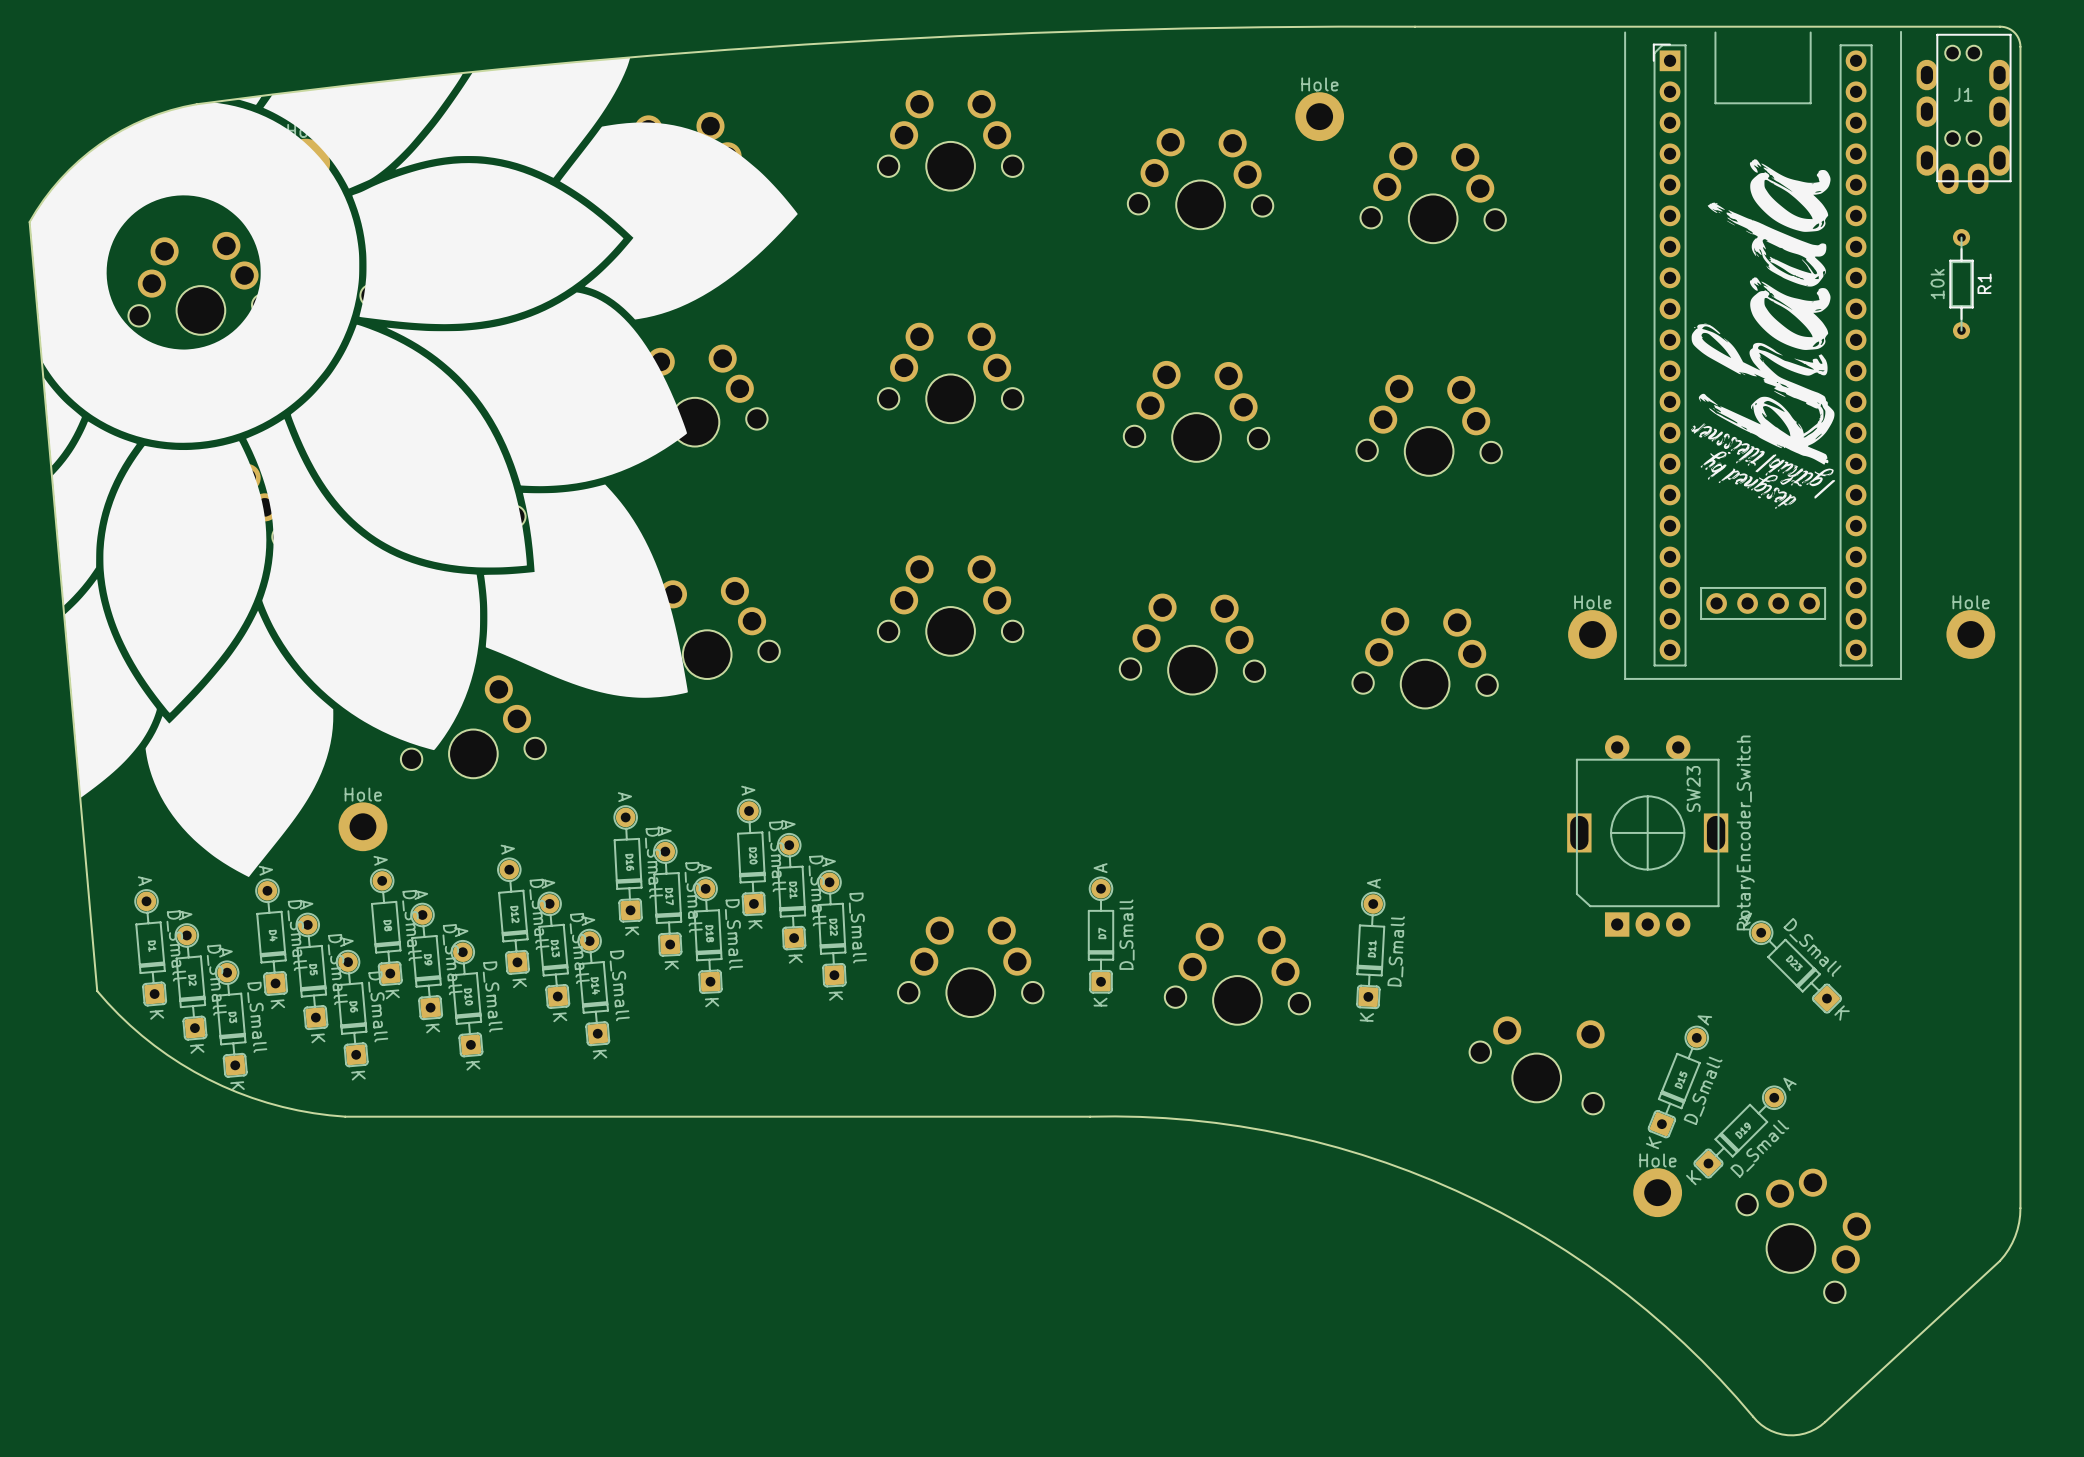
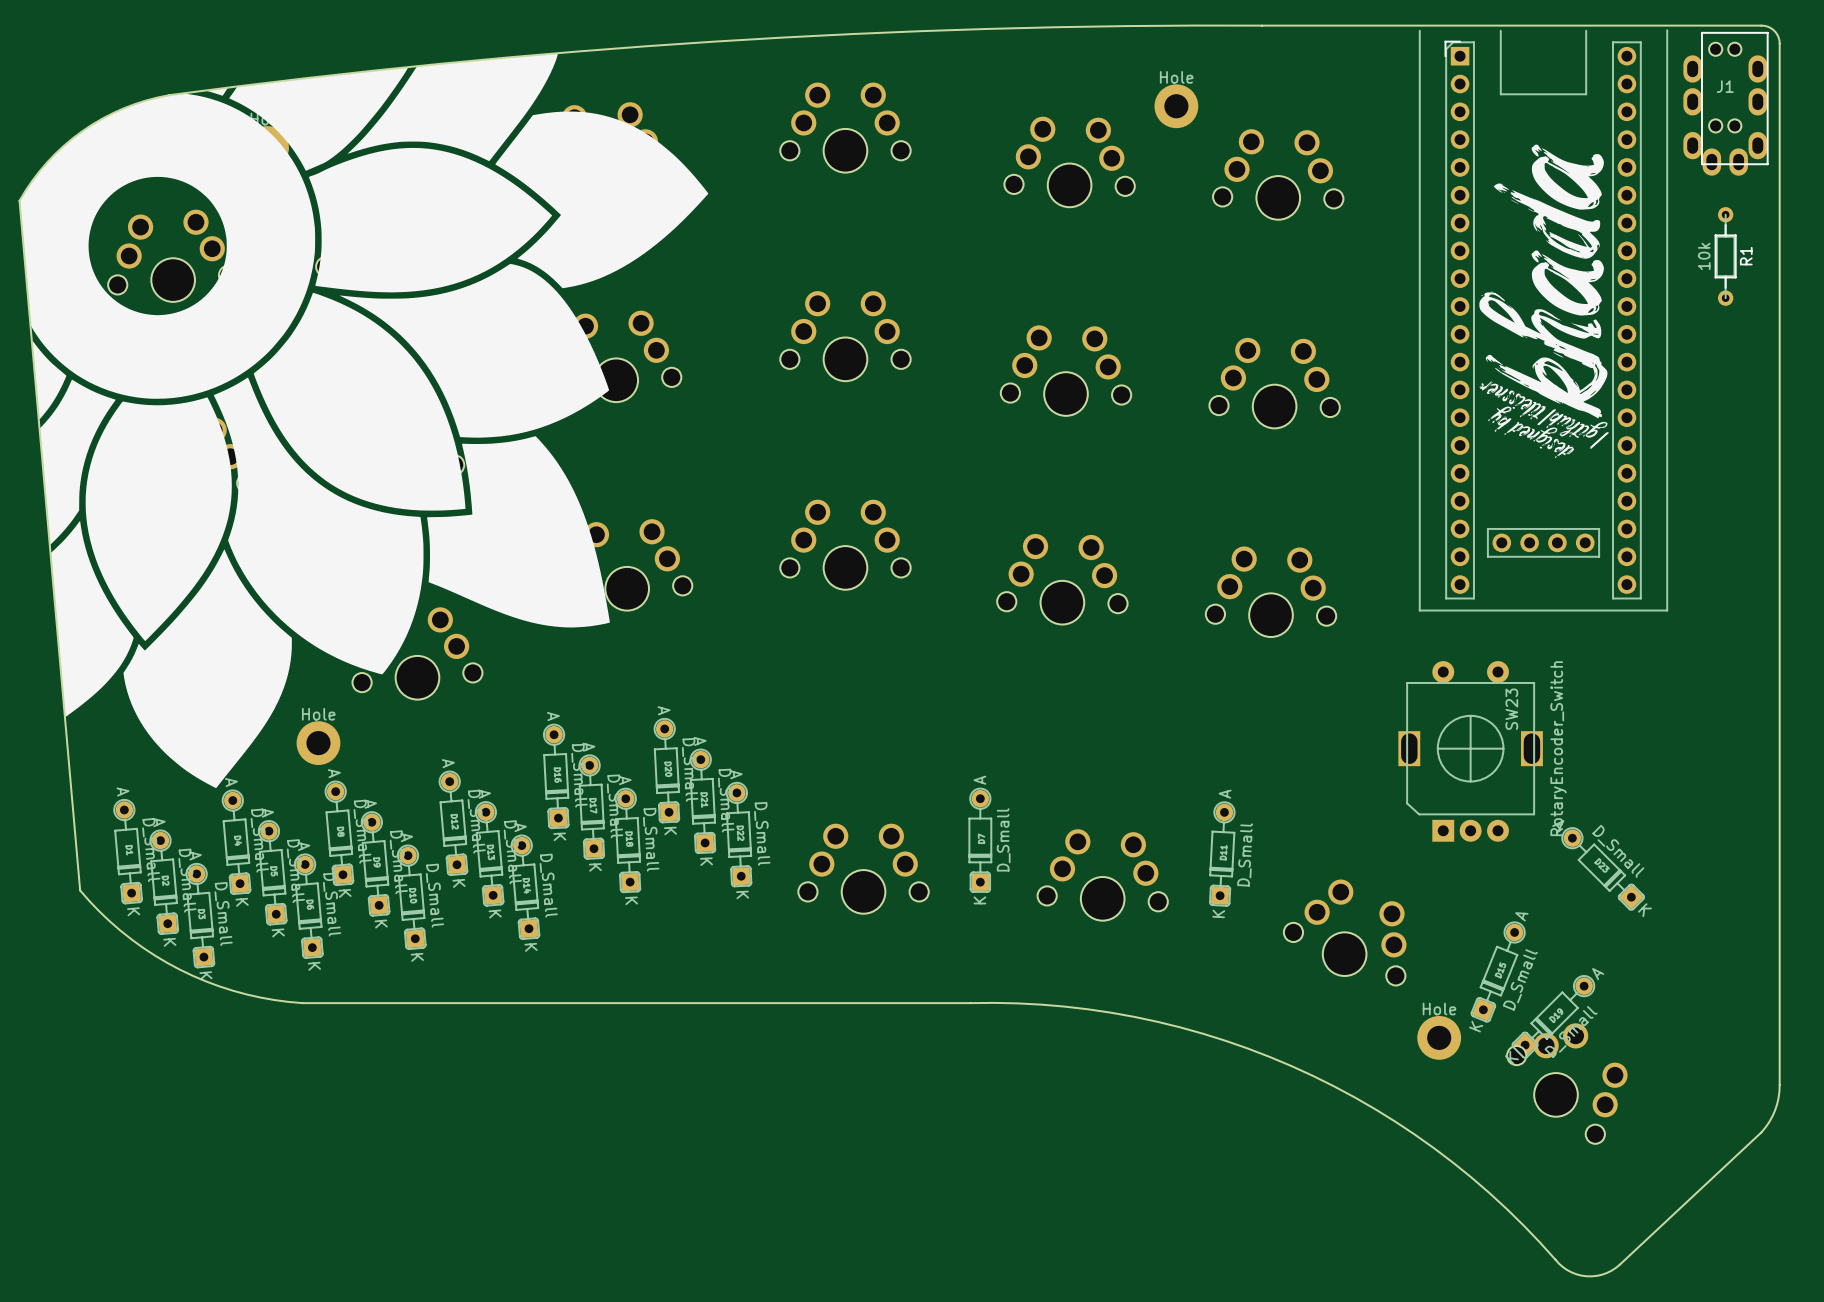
board edge: (1971, 26) (2008, 28) (2017, 36) (2020, 46) (2020, 1208) (2017, 1229) (2004, 1255) (1820, 1425) (1799, 1434) (1782, 1434) (1761, 1424) (1684, 1343) (1646, 1310) (1607, 1279) (1544, 1237) (1501, 1212) (1456, 1190) (1409, 1171) (1362, 1154) (1314, 1141) (1264, 1130) (1215, 1122) (1165, 1118) (1090, 1116) -> (1761, 25) (1774, 30) (1779, 43) (1779, 1085) (1777, 1104) (1765, 1127) (1615, 1267) (1596, 1275) (1581, 1275) (1562, 1266) (1506, 1208) (1434, 1148) (1375, 1109) (1291, 1066) (1225, 1040) (1134, 1016) (1064, 1006) (970, 1003)
J1 position: (1964, 113) -> (1725, 103)
R1 position: (1961, 284) -> (1725, 256)
drawing position: (1763, 311) -> (1543, 281)
part position: (1763, 355) -> (1543, 320)
drawing position: (1763, 466) -> (1544, 419)
part: Hole (1592, 634) -> none
part: Hole (1970, 634) -> none
part: none -> (1345, 932)
part: (1537, 1065) -> none
part position: (1657, 1192) -> (1439, 1037)
part position: (1803, 1235) -> (1567, 1083)

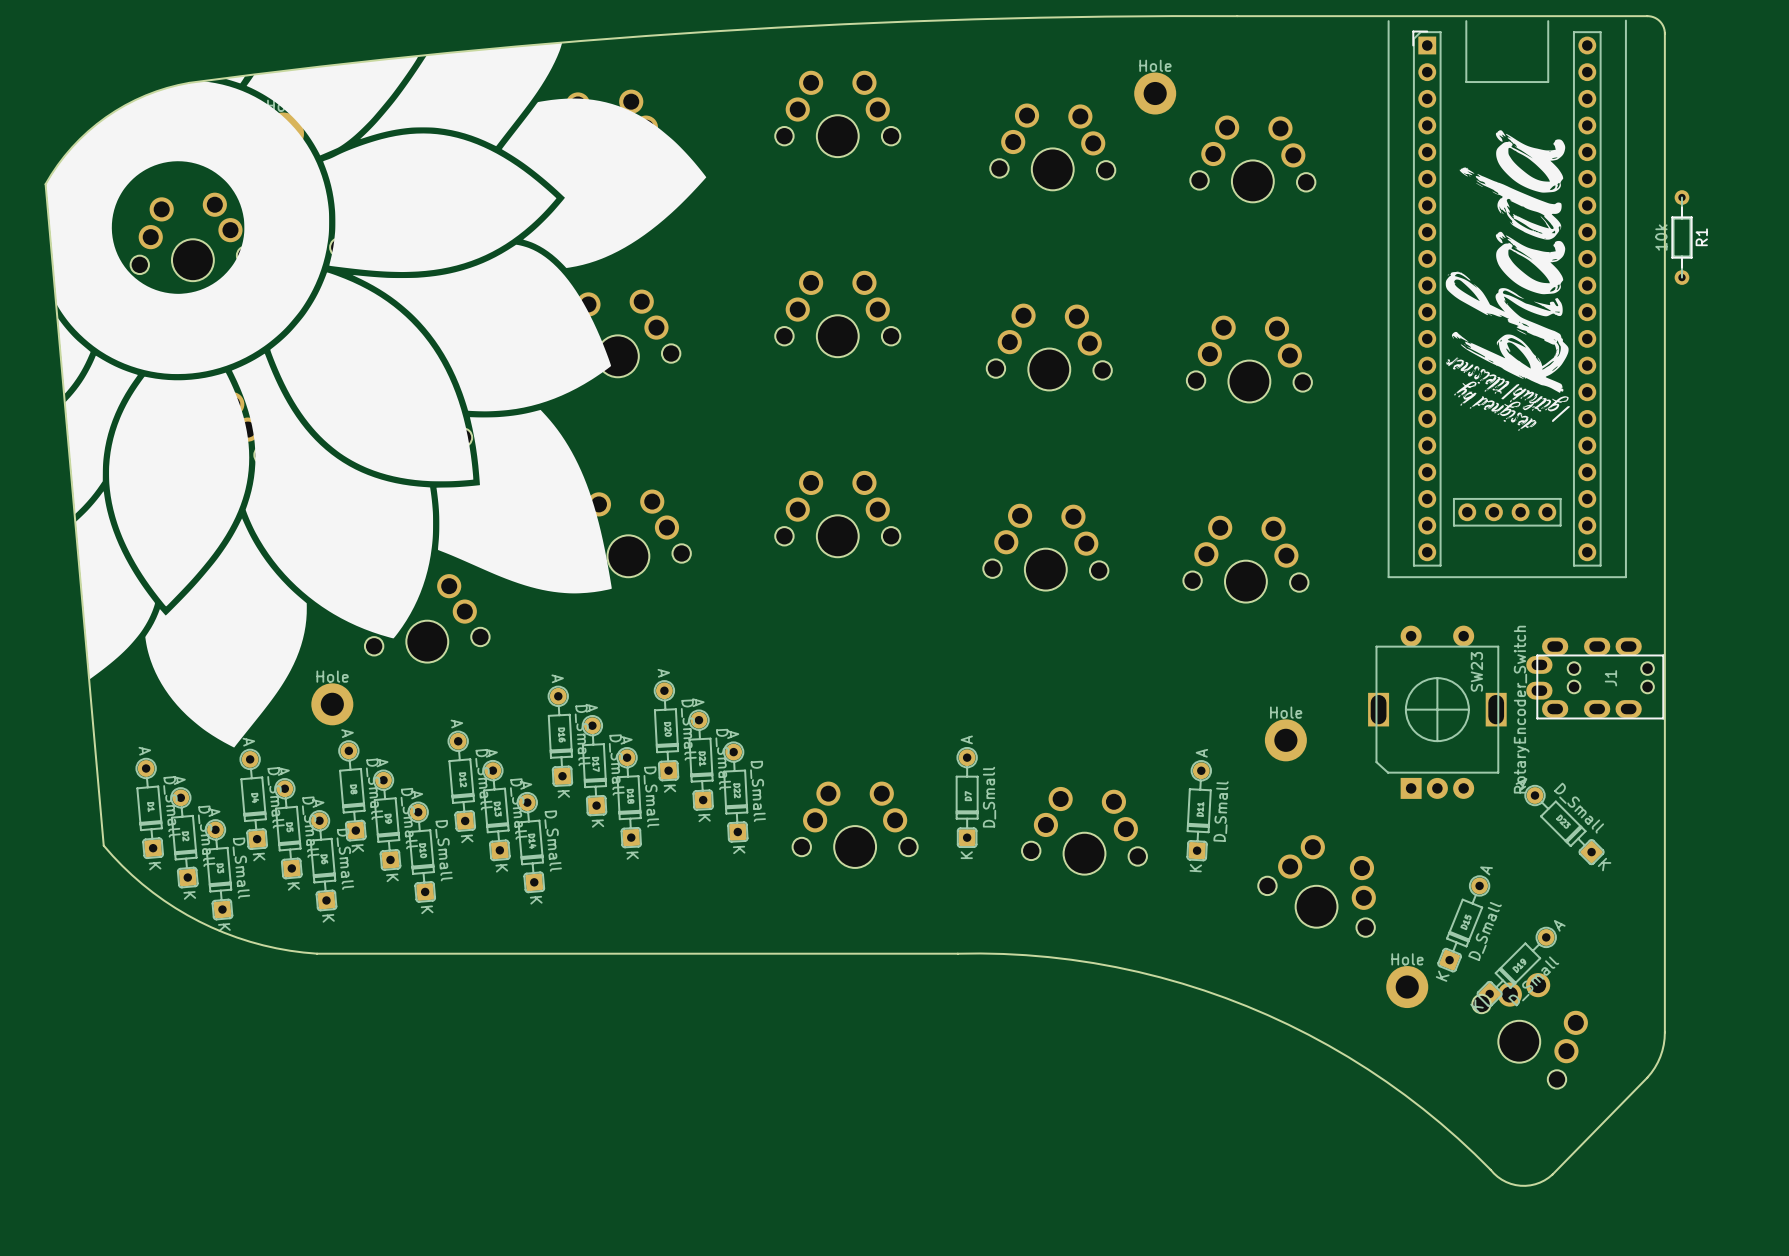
board edge: (1689, 25) (1765, 26) (1775, 32) (1779, 41) (1779, 1085) (1777, 1104) (1765, 1127) (1615, 1267) (1596, 1275) (1581, 1275) (1562, 1266) (1506, 1208) (1434, 1148) (1375, 1109) (1291, 1066) (1225, 1040) (1134, 1016) (1064, 1006) (970, 1003) -> (1647, 16) (1659, 21) (1664, 33) (1664, 1032) (1660, 1056) (1651, 1072) (1548, 1177) (1530, 1185) (1515, 1185) (1497, 1176) (1440, 1123) (1367, 1069) (1308, 1034) (1246, 1006) (1182, 983) (1116, 967) (1026, 955) (957, 953)
J1 rotation: 0° (1725, 103) -> 90° clockwise (1595, 678)
J1 position: (1725, 103) -> (1595, 678)
part: none -> Hole (1285, 740)

